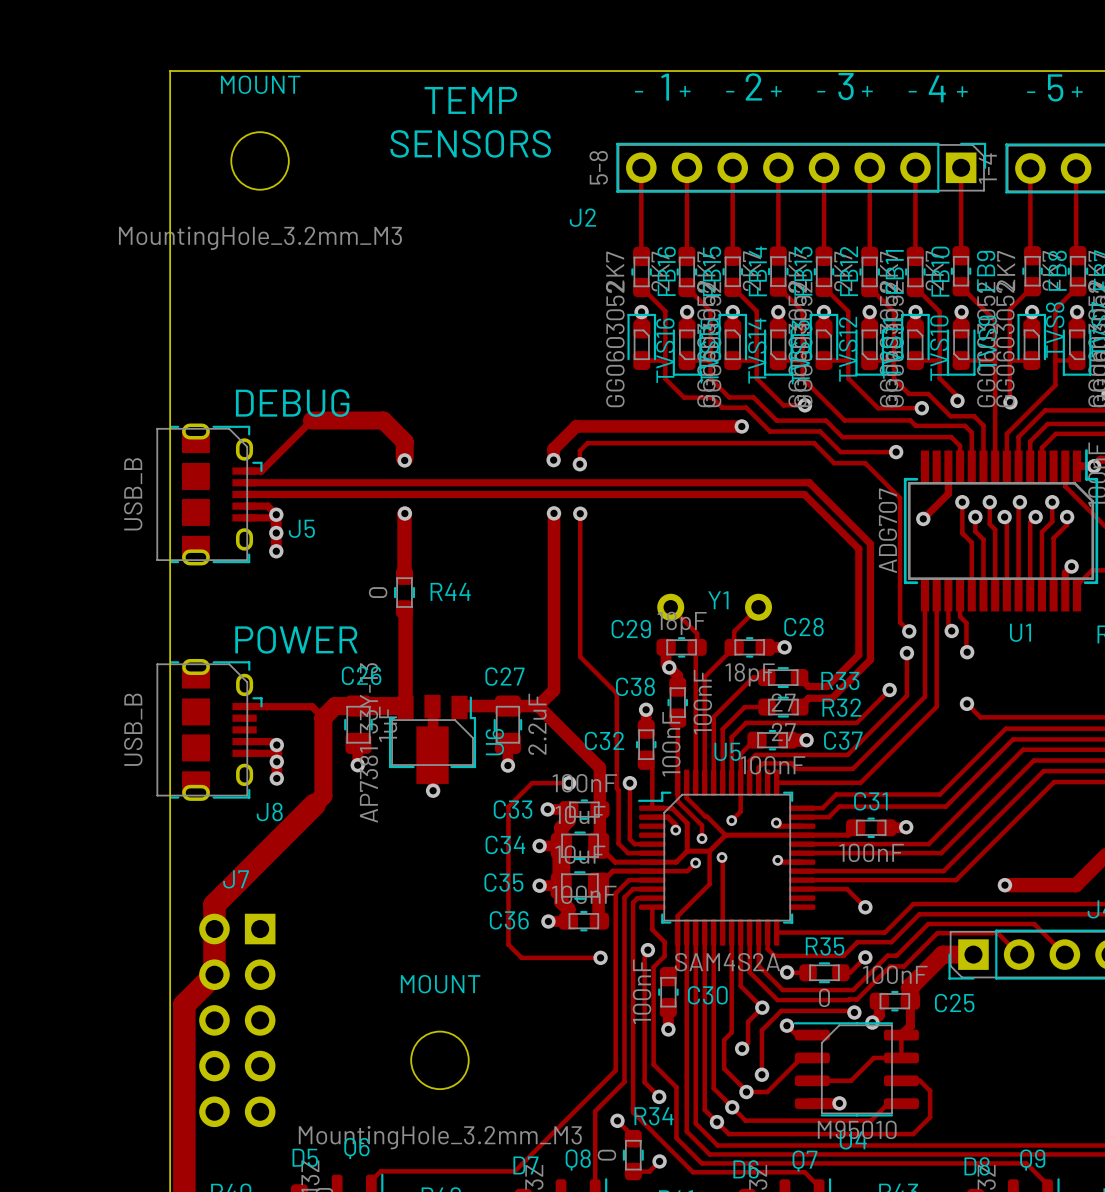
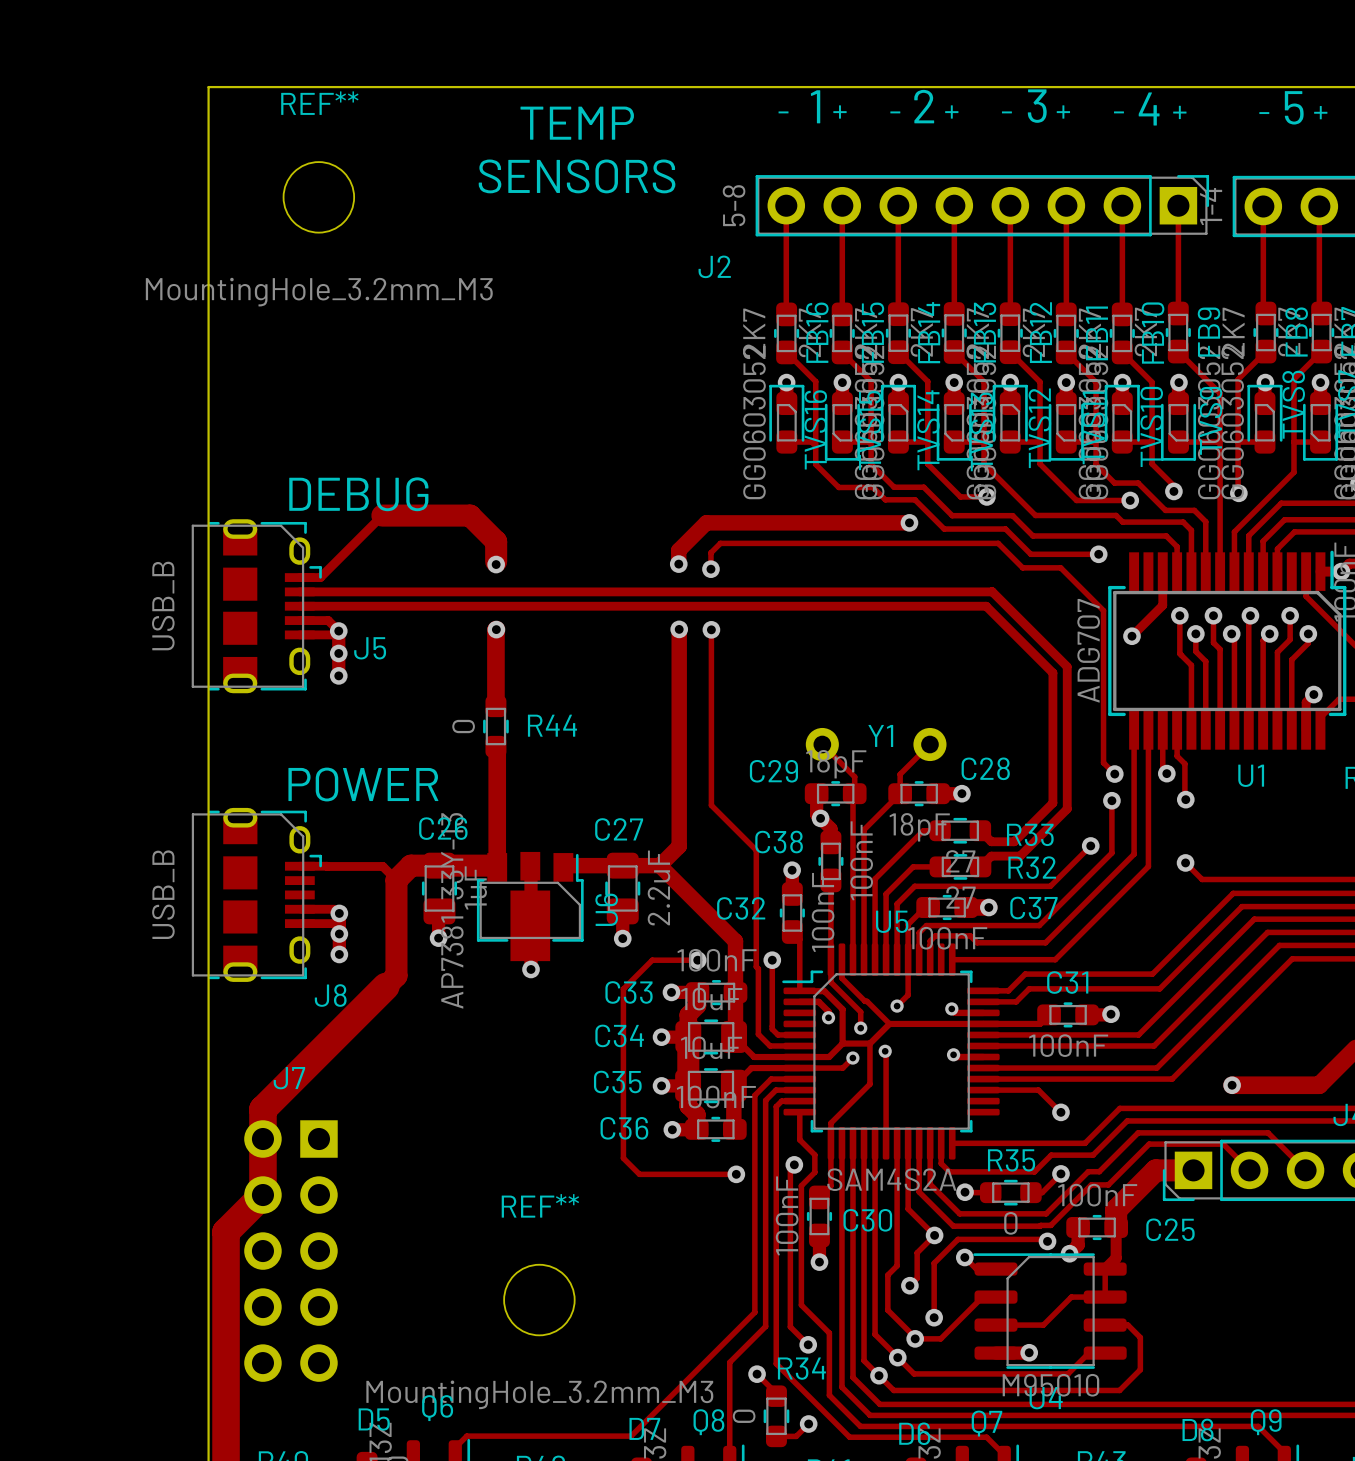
MOUNT name: MOUNT (260, 84) -> REF** (319, 103)
MOUNT name: MOUNT (440, 984) -> REF** (540, 1205)

